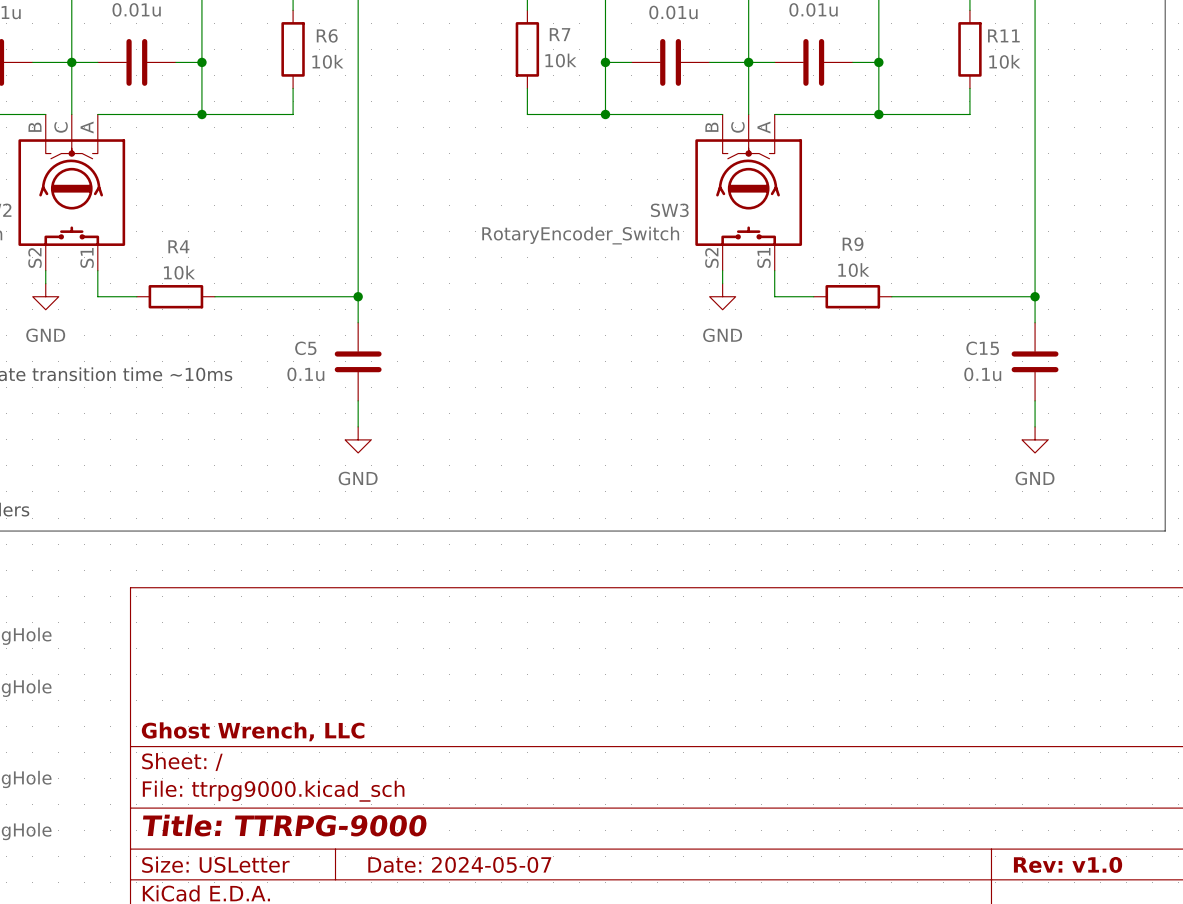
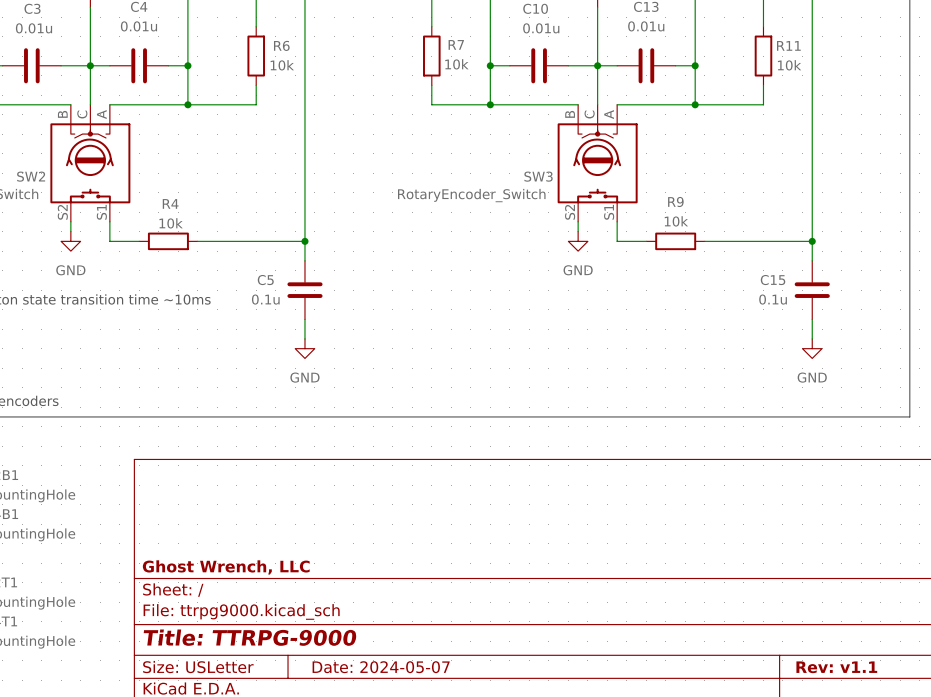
title block: Rev: v1.0 (1068, 864) -> Rev: v1.1 (836, 667)

